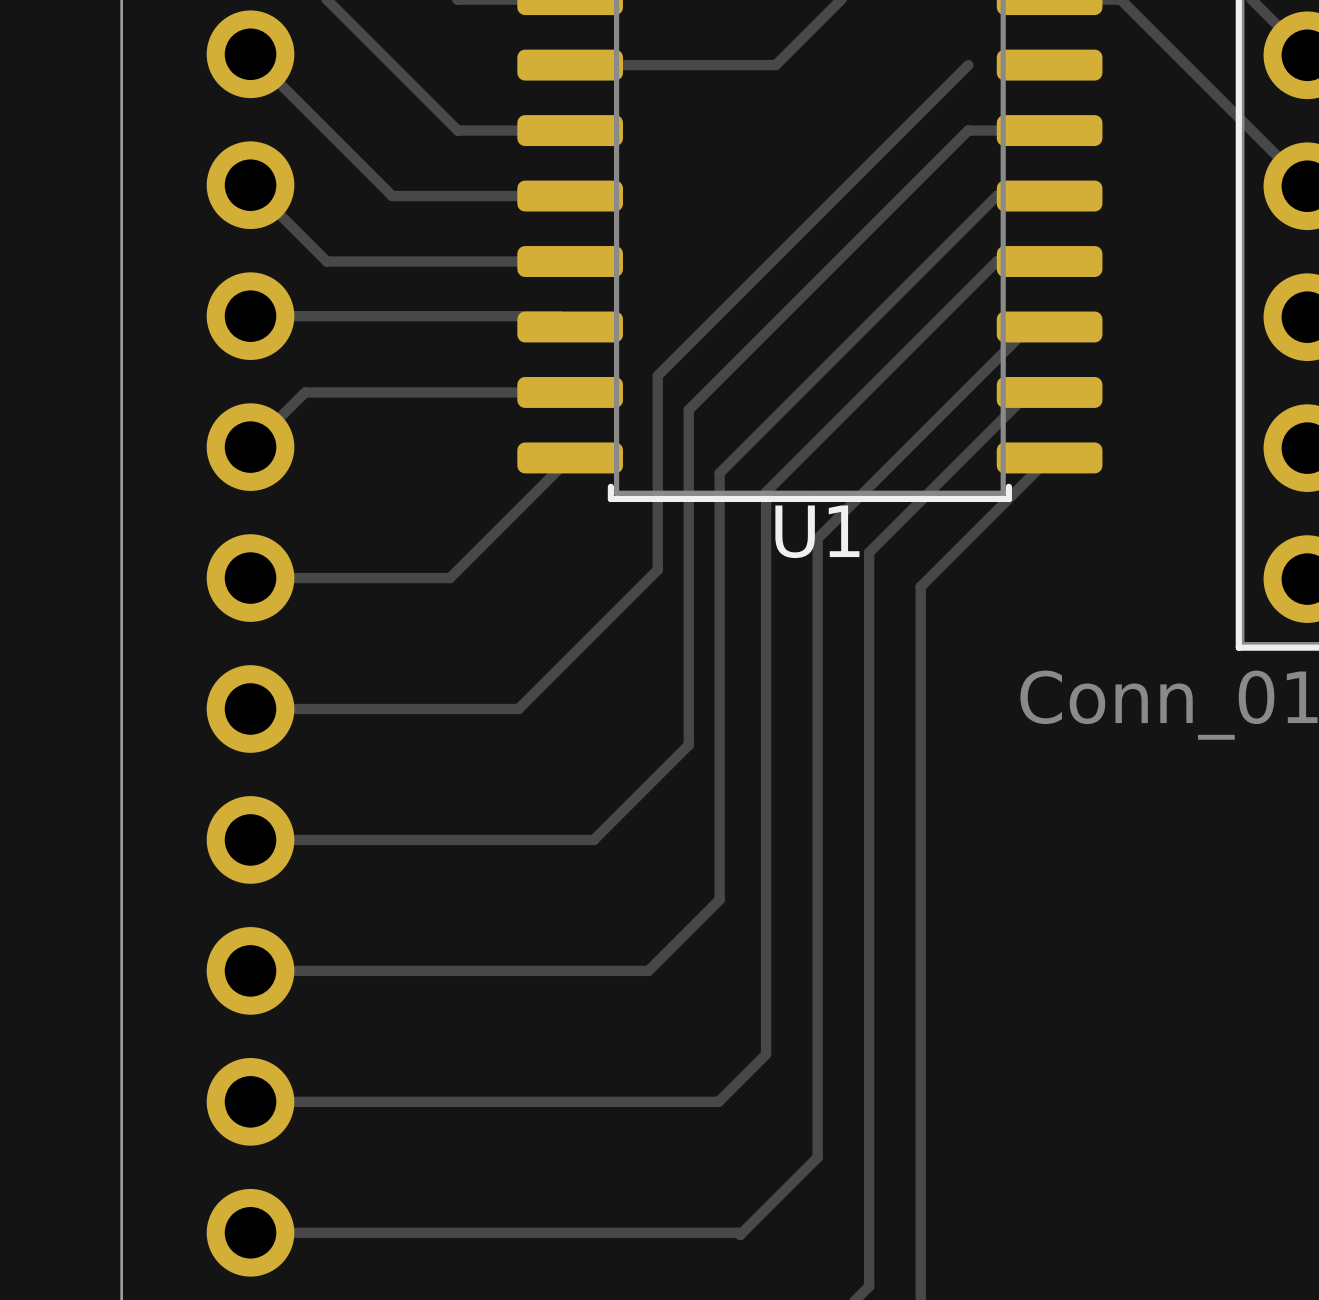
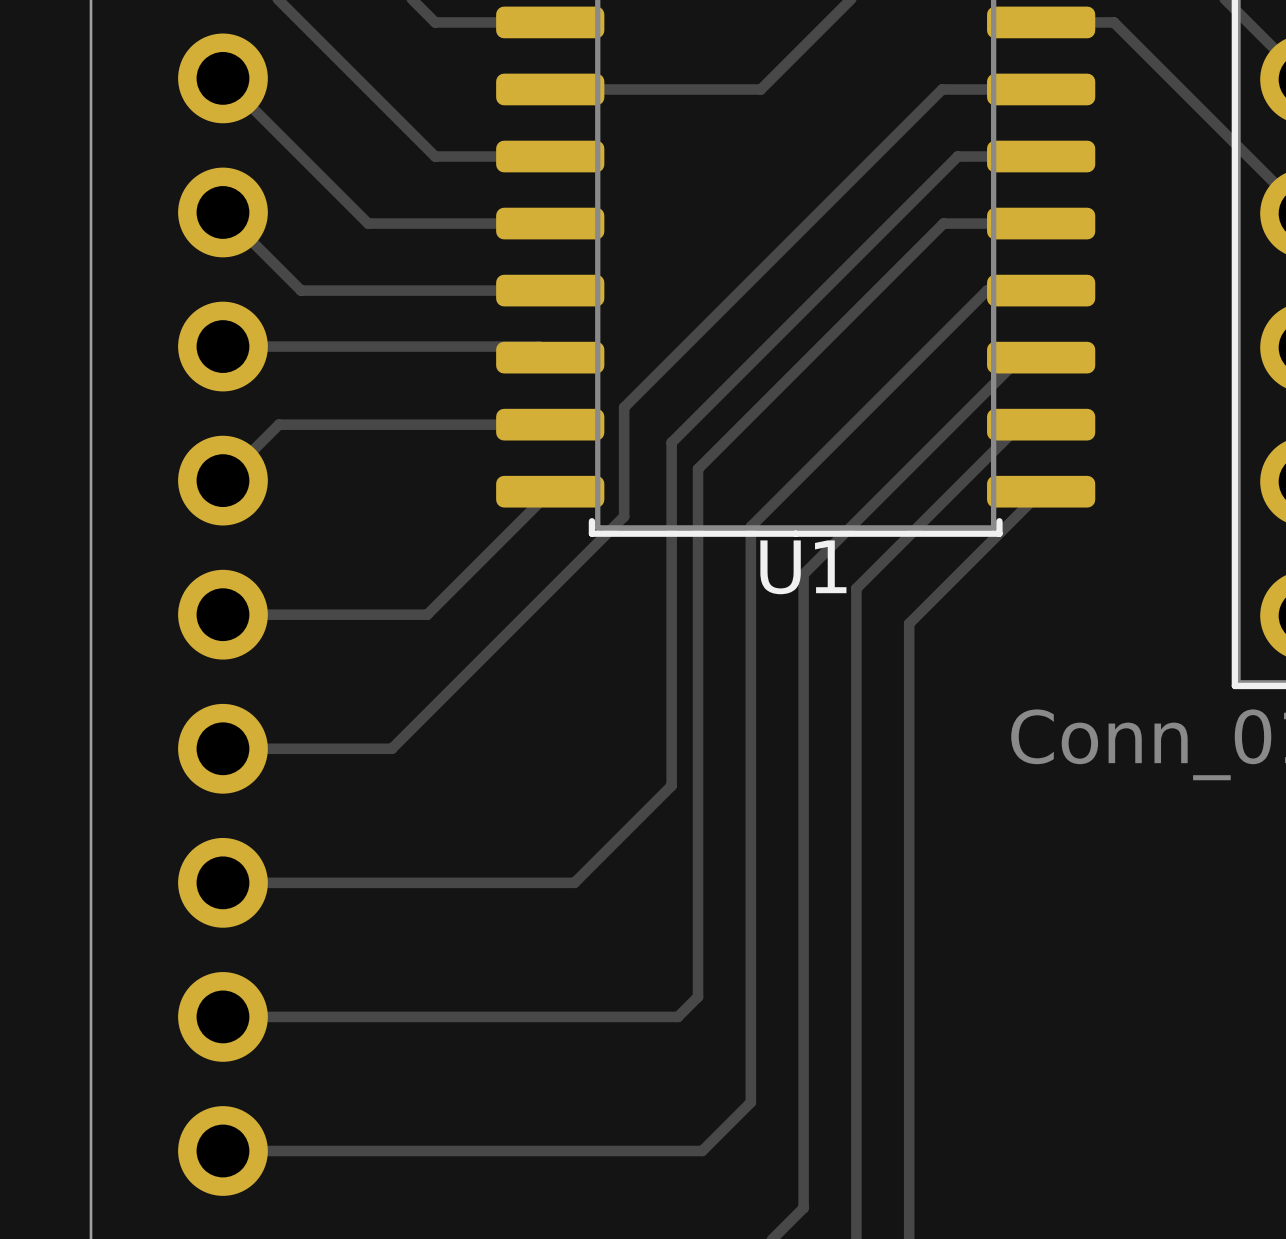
track: (968, 65) (657, 375) (657, 569) (518, 709) (415, 709) -> (1041, 89) (942, 89) (624, 407) (624, 516) (391, 748)
track: (996, 196) (719, 473) (719, 899) (648, 970) -> (987, 223) (943, 223) (698, 469) (698, 996) (677, 1016) (630, 1016)

